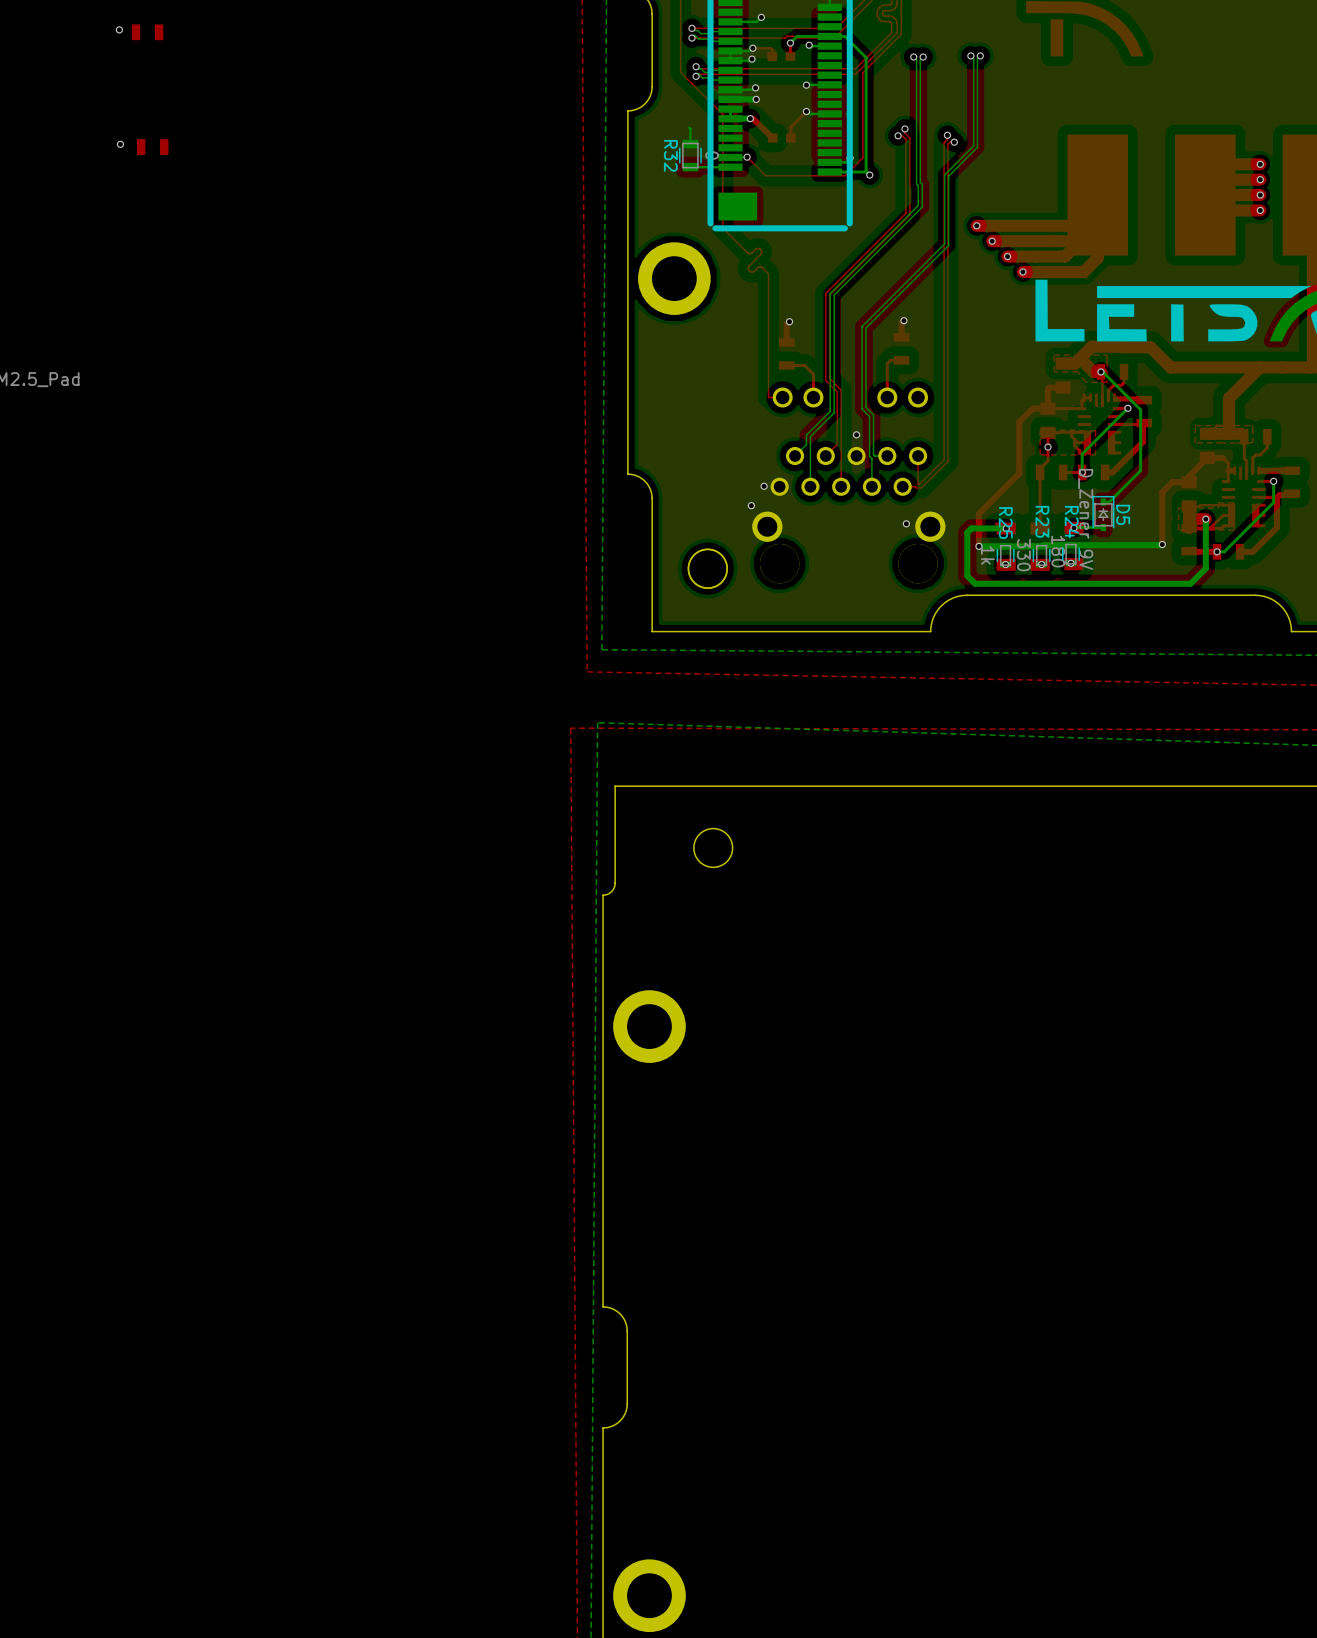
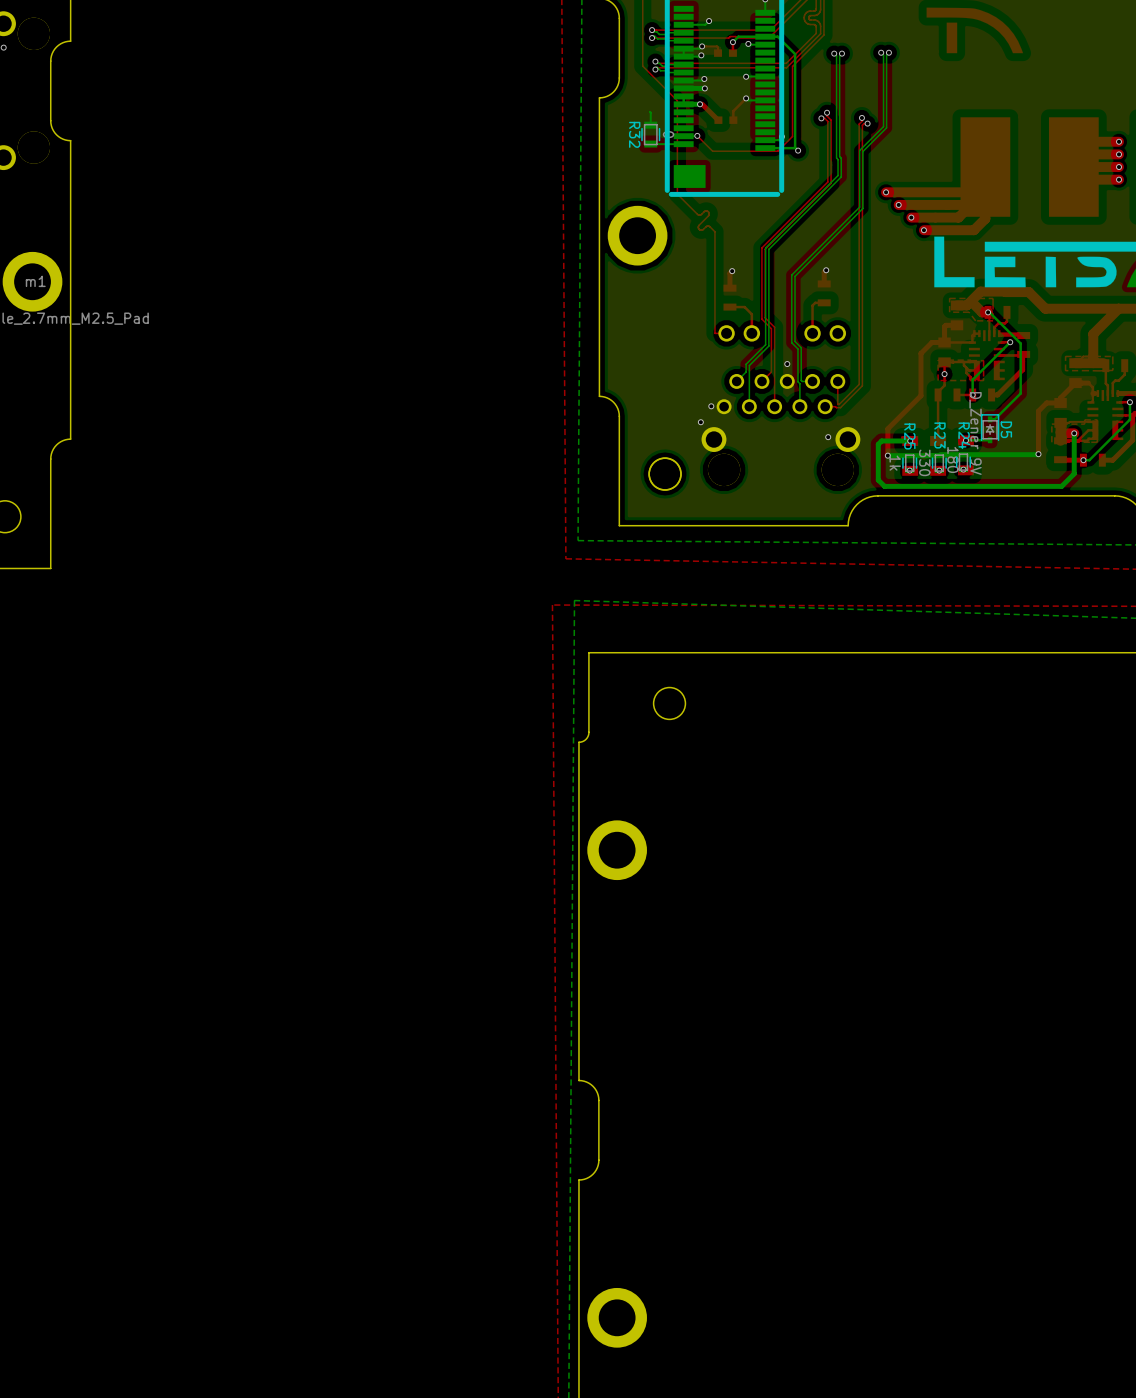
via: (119, 29) -> none
part: (147, 32) -> none
via: (120, 144) -> none
part: (152, 147) -> none

